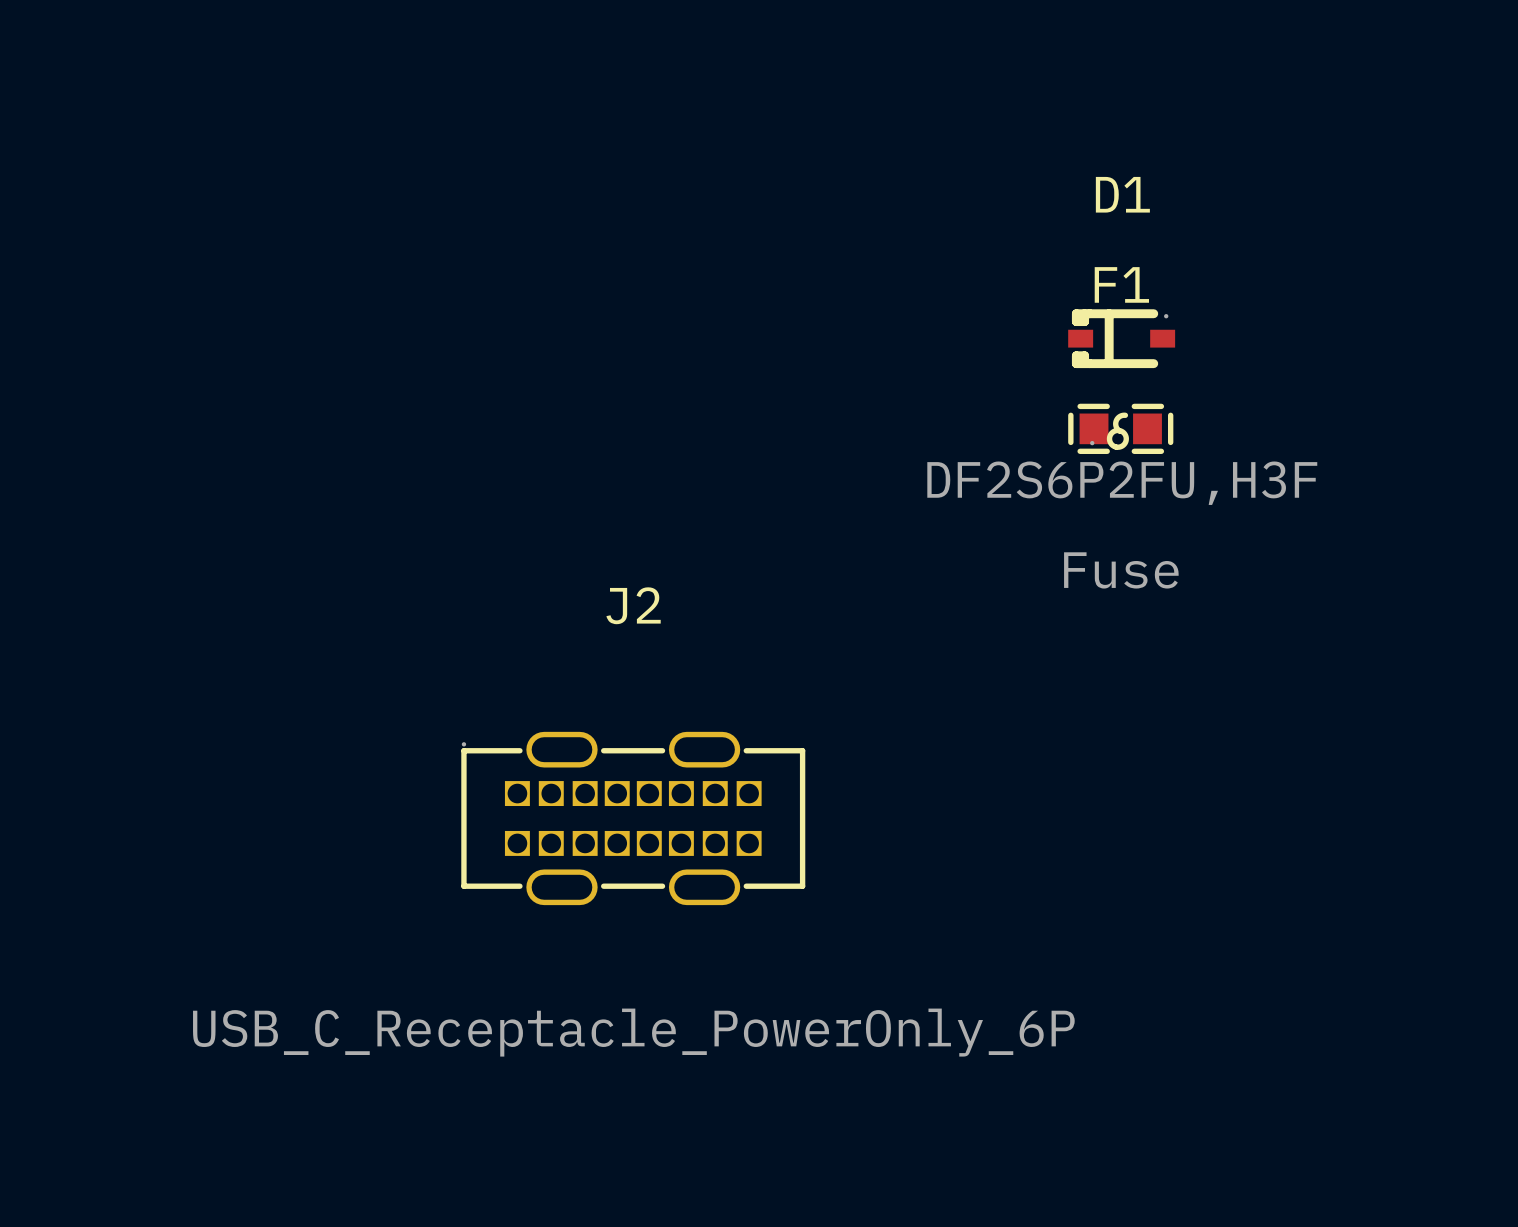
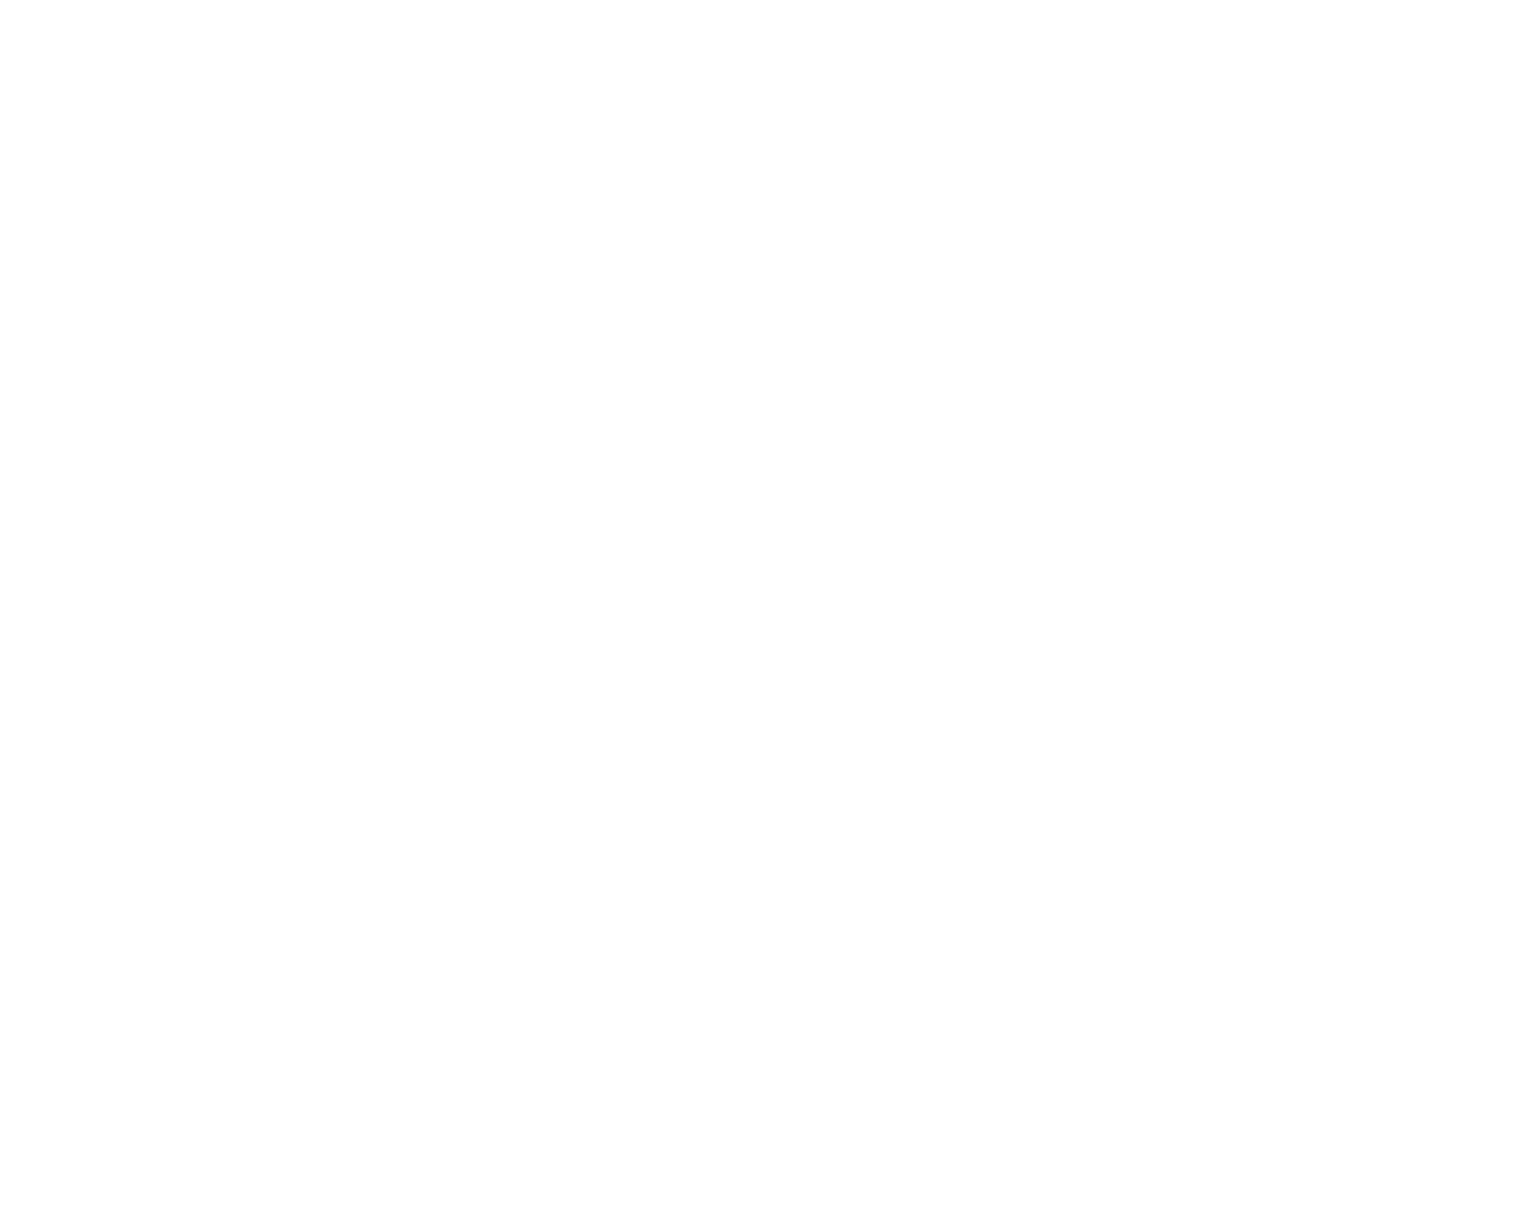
D1: DF2S6P2FU,H3F (1121, 338) -> none
F1: Fuse (1120, 428) -> none
J2: USB_C_Receptacle_PowerOnly_6P (633, 818) -> none

